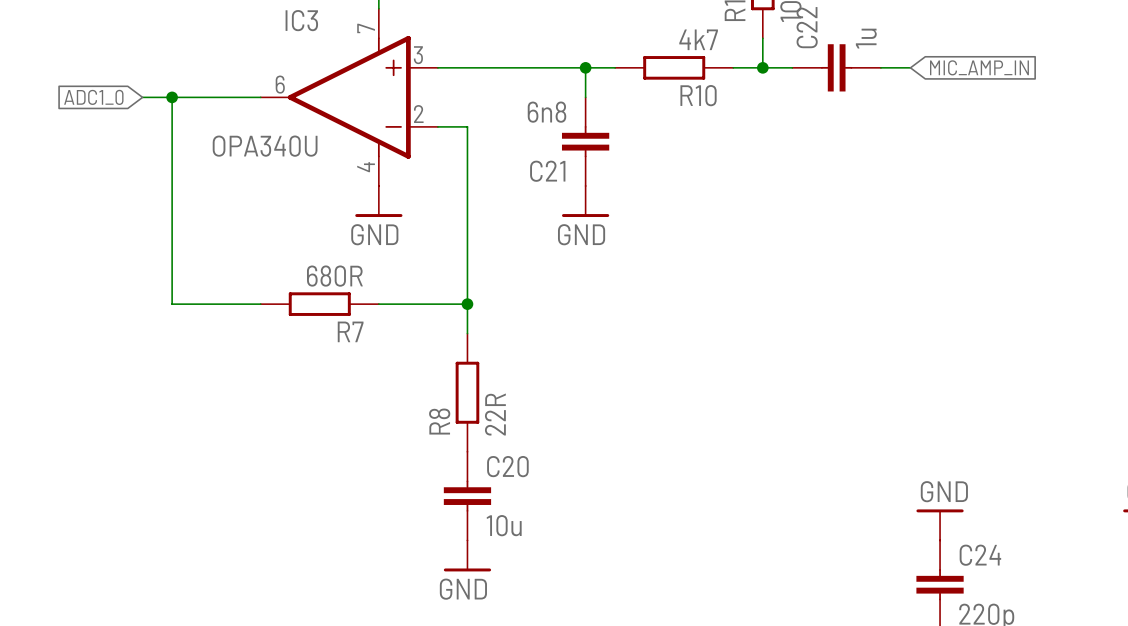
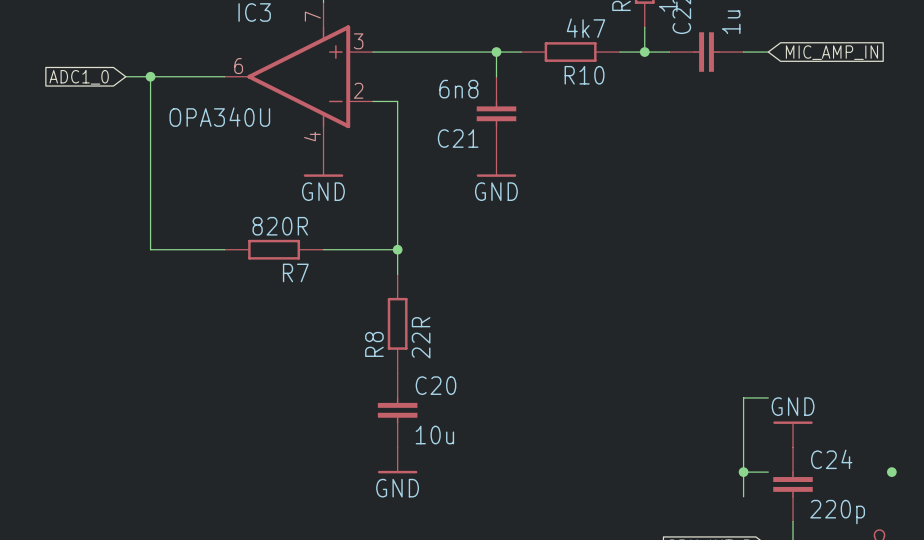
R7 value: 680R (334, 276) -> 820R (280, 226)
wire: none -> (768, 397) (743, 397) (743, 496)
wire: none -> (743, 472) (768, 472)
junction: none -> (743, 472)
junction: none -> (891, 472)

